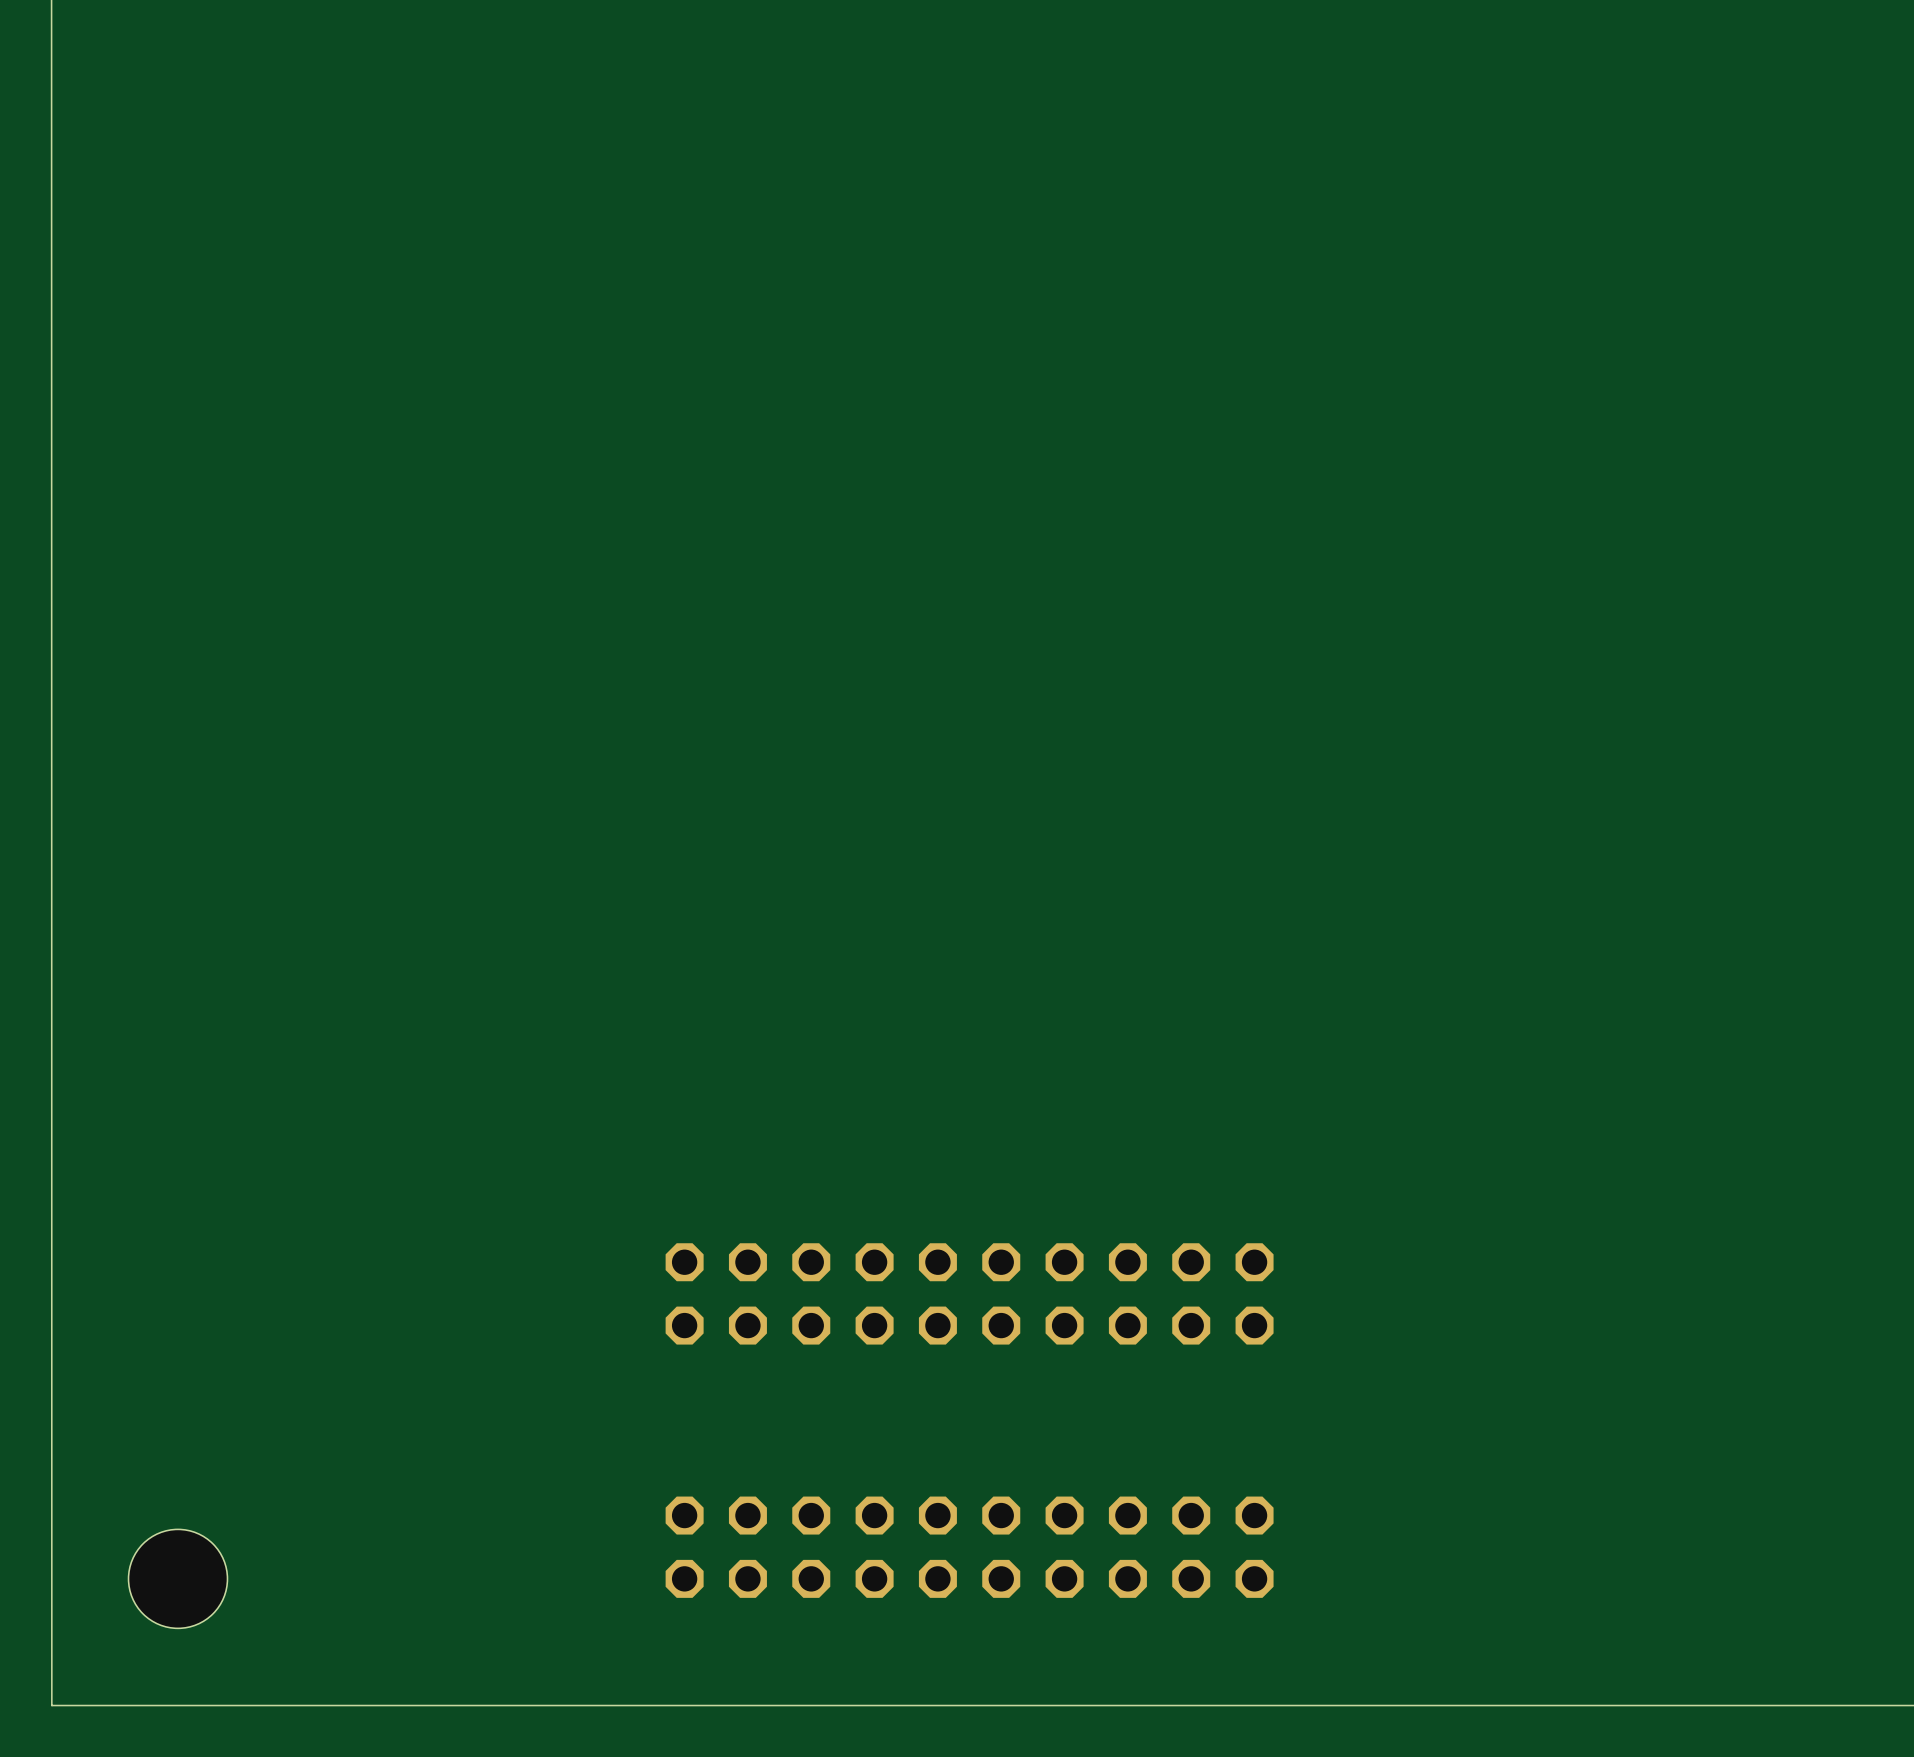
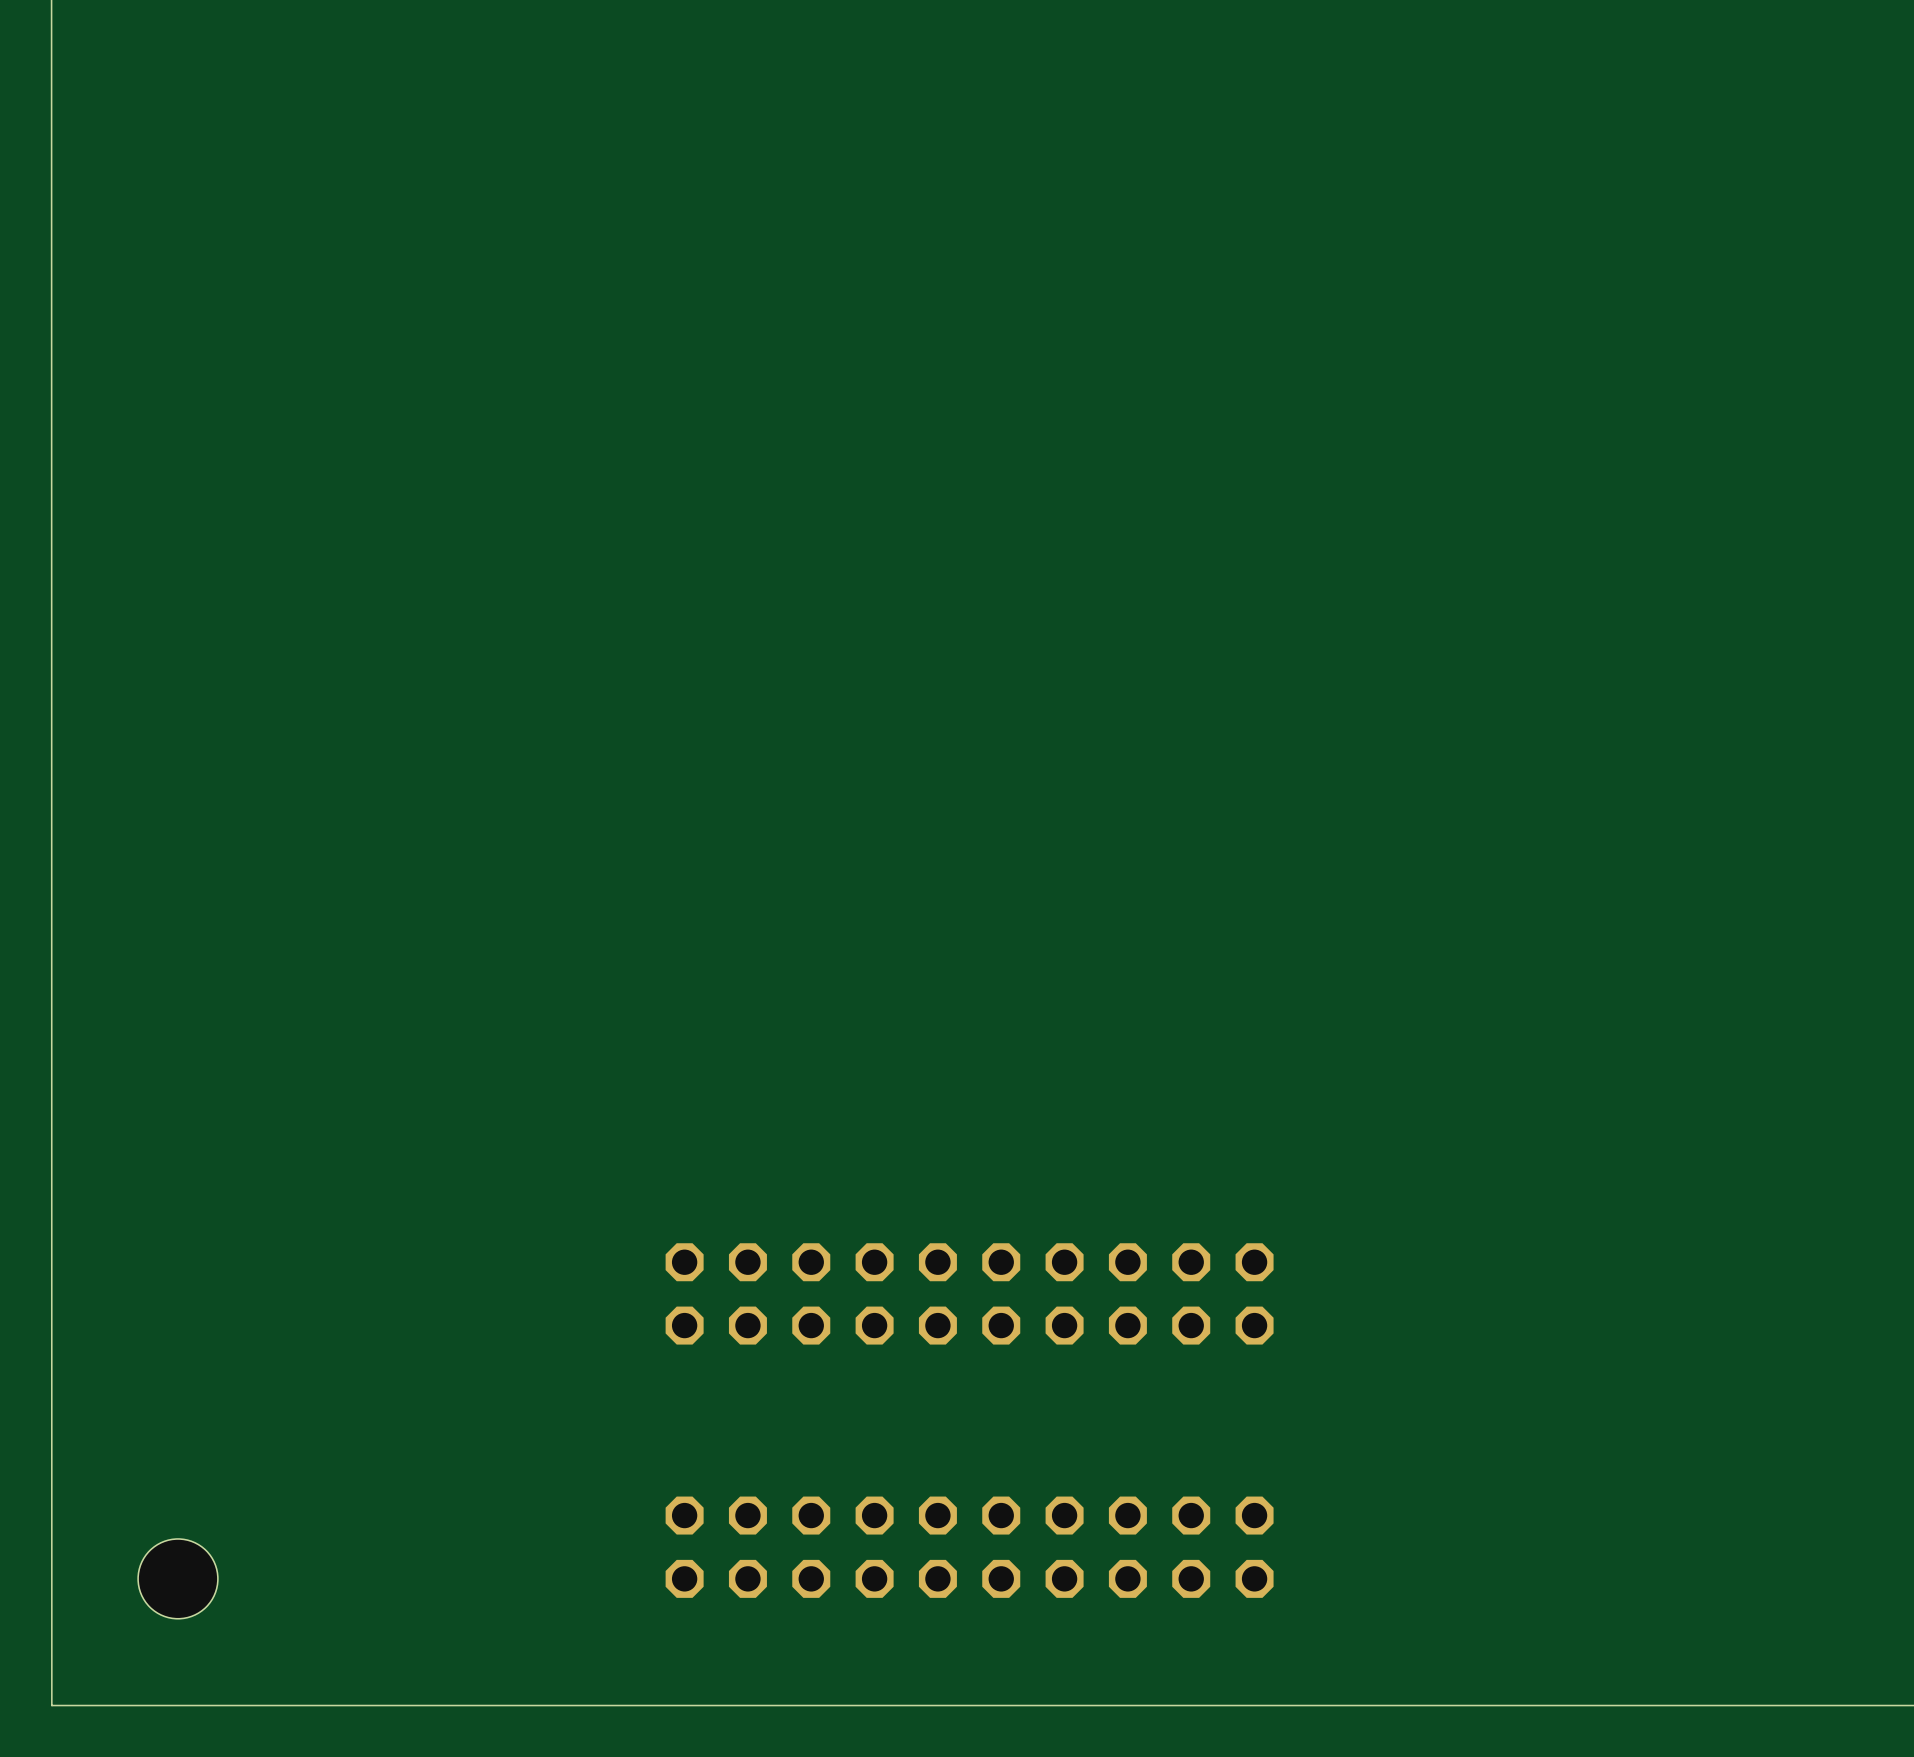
hole size: [128, 1529, 228, 1629] -> [138, 1538, 218, 1619]

